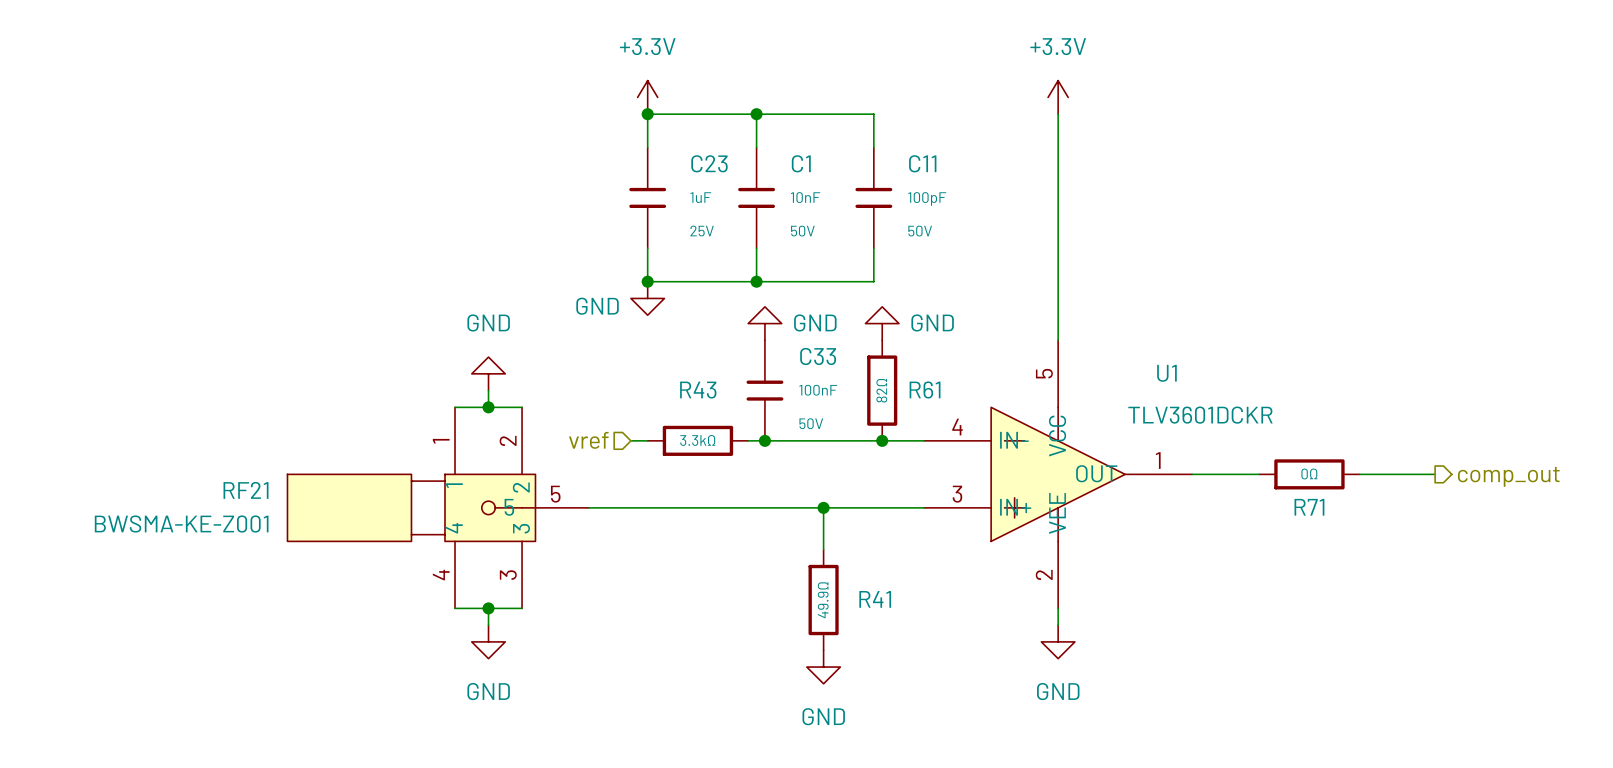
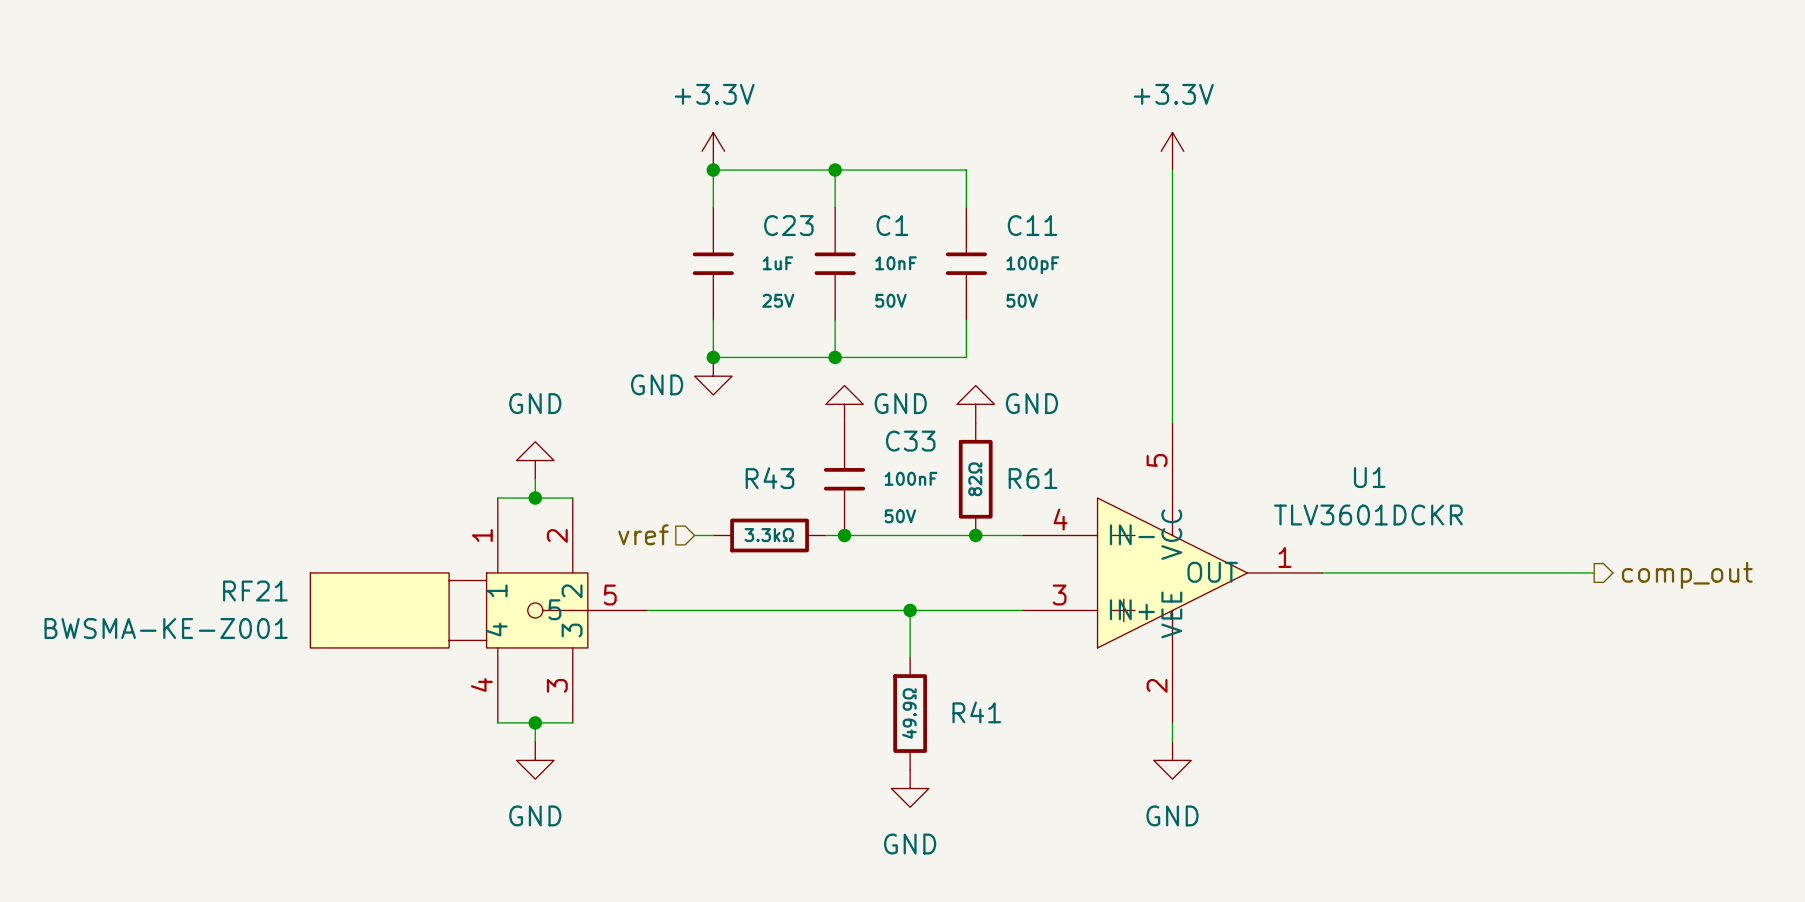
U1 name position: U1 (1166, 373) -> U1 (1369, 477)
U1 value position: TLV3601DCKR (1200, 415) -> TLV3601DCKR (1368, 515)
wire: none -> (1397, 572) (1509, 572)
R71: 0Ω (1309, 474) -> none

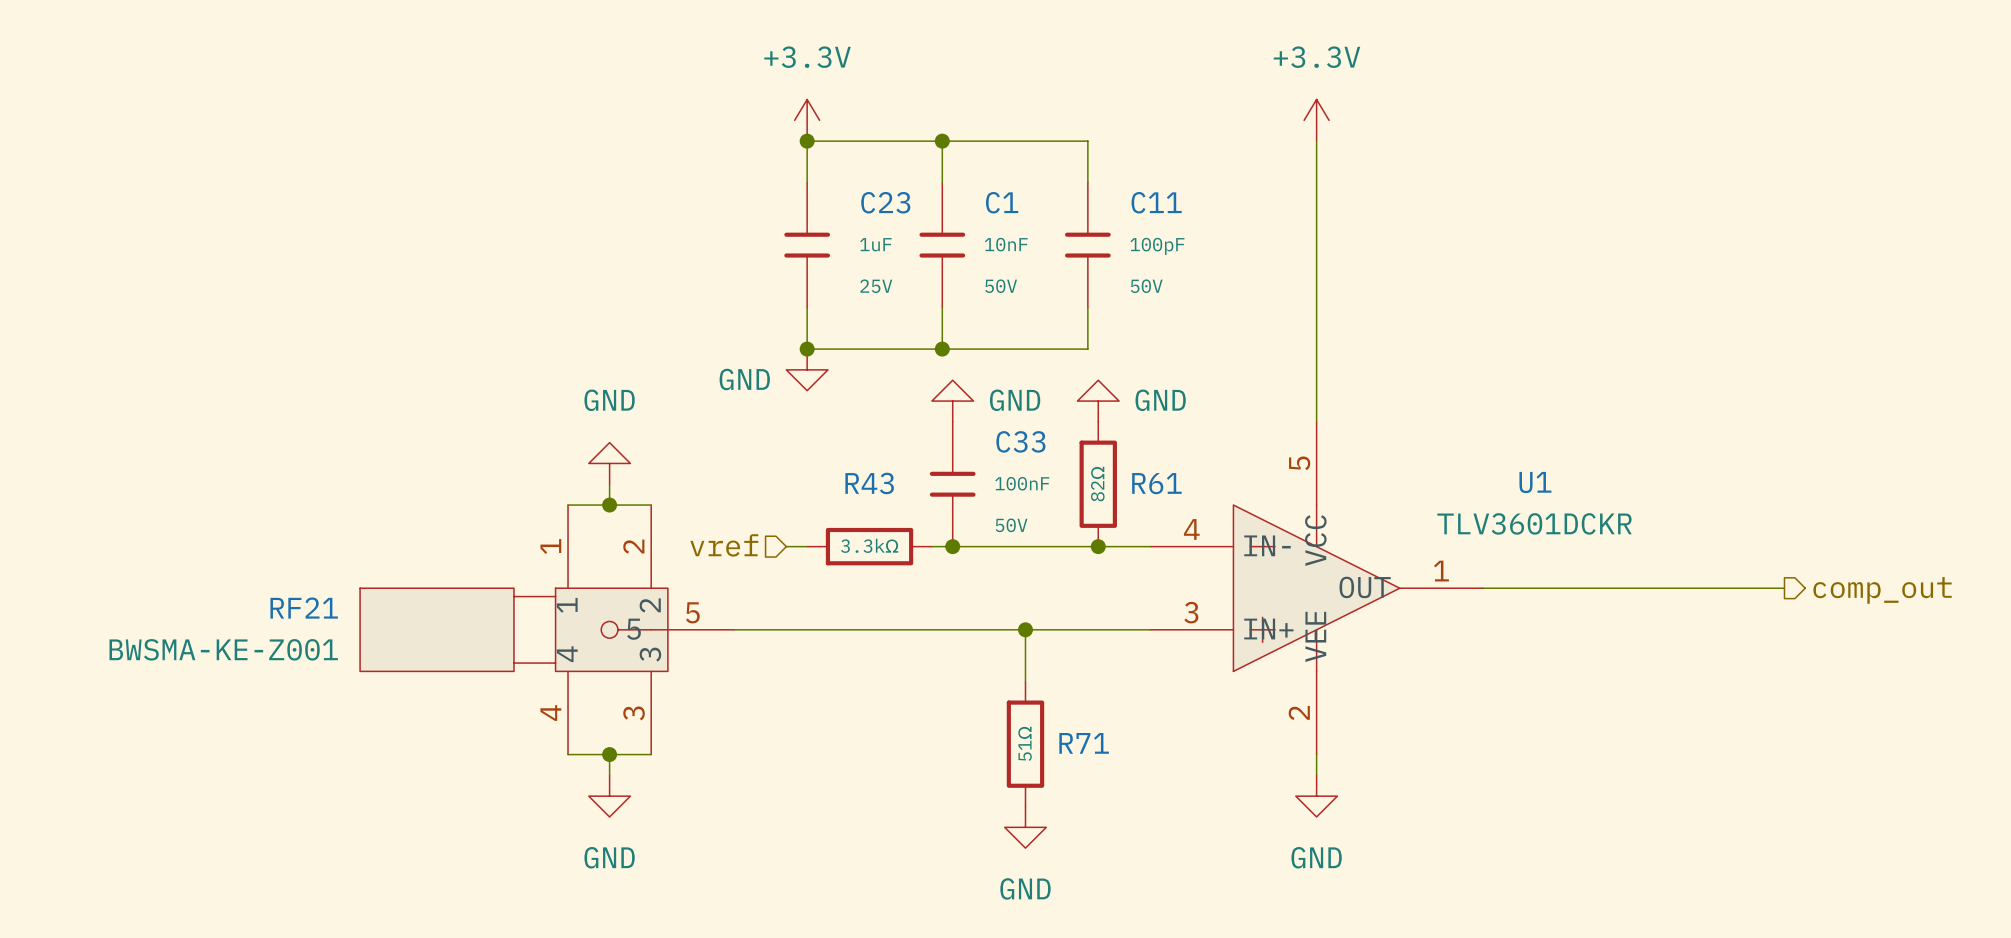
R41 name: R41 (976, 712) -> R71 (1084, 743)
R41 value: 49.9Ω (909, 713) -> 51Ω (1025, 743)

